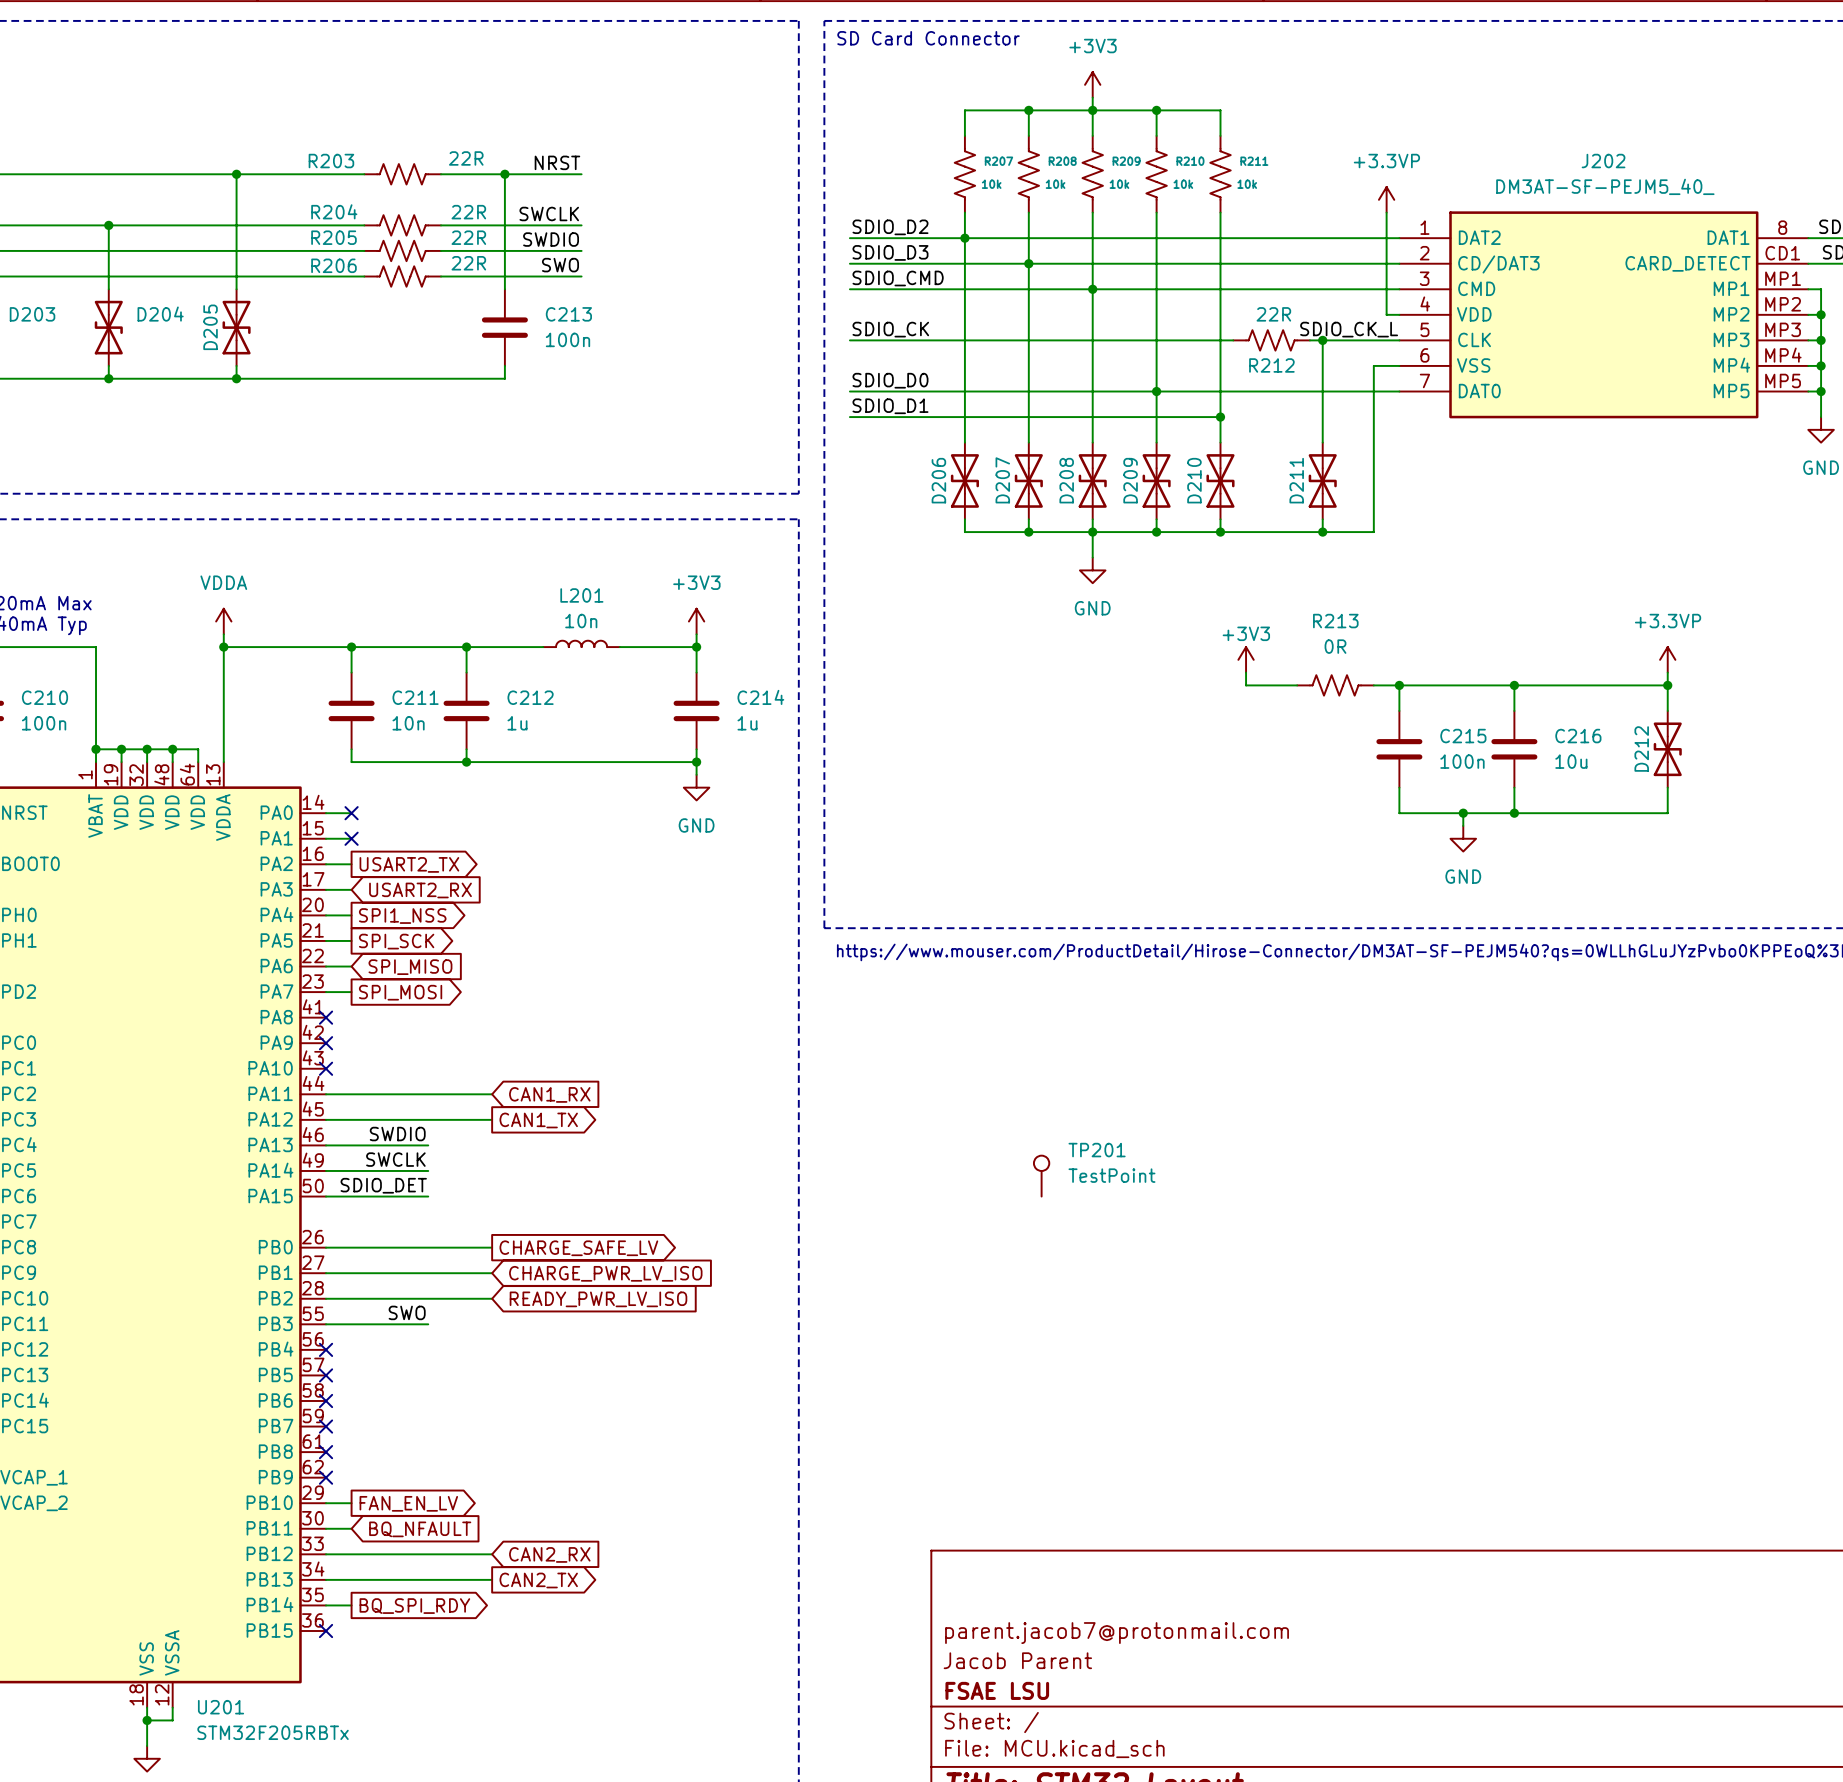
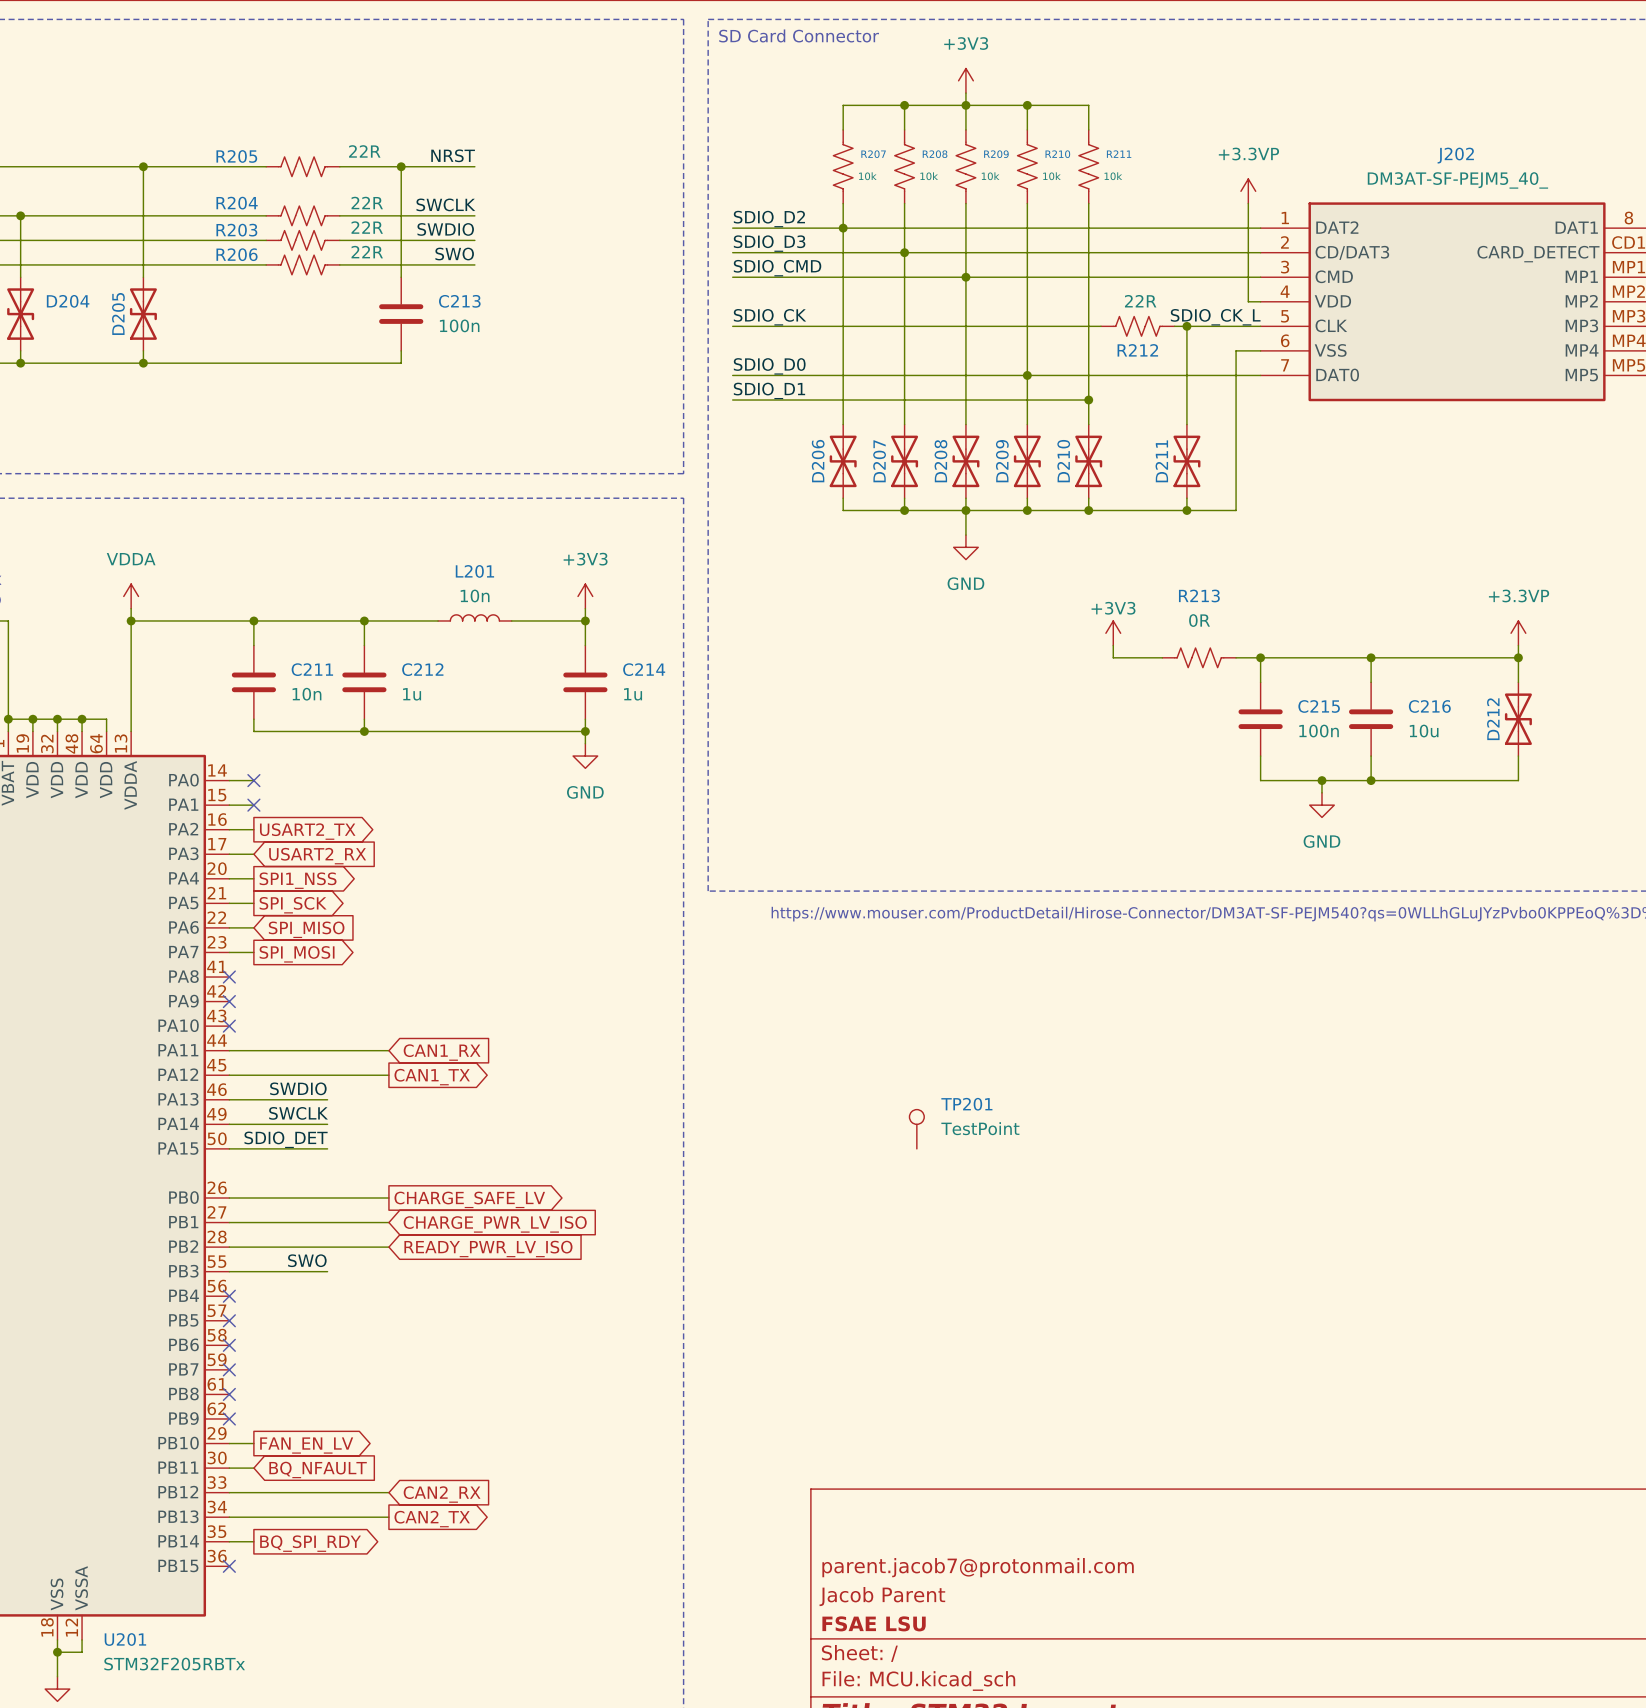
R203 name: R203 (331, 161) -> R205 (236, 156)
R205 name: R205 (333, 237) -> R203 (236, 230)

